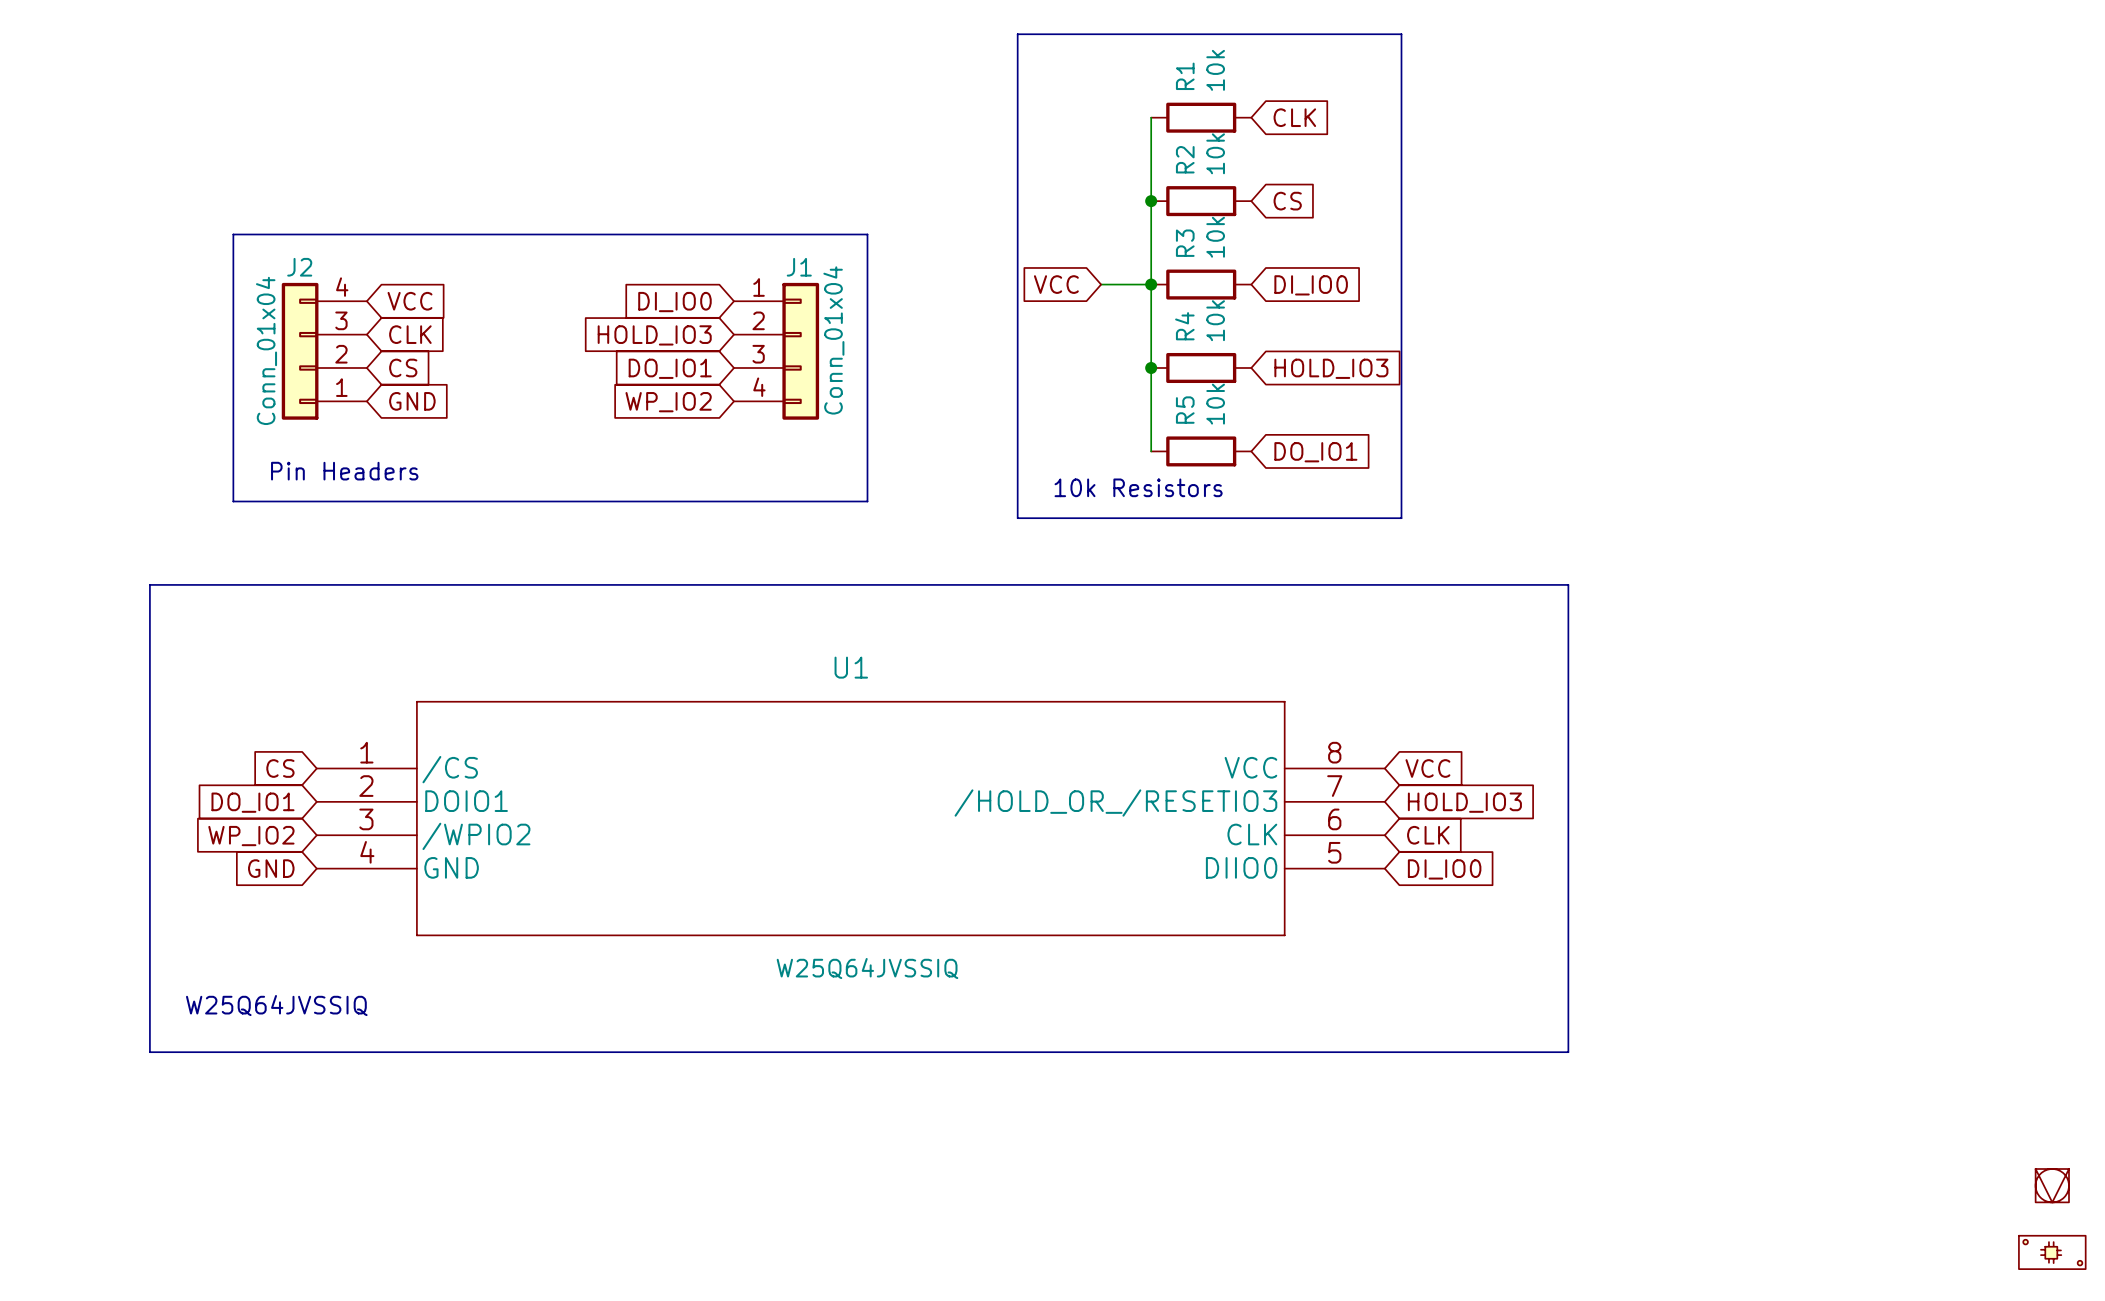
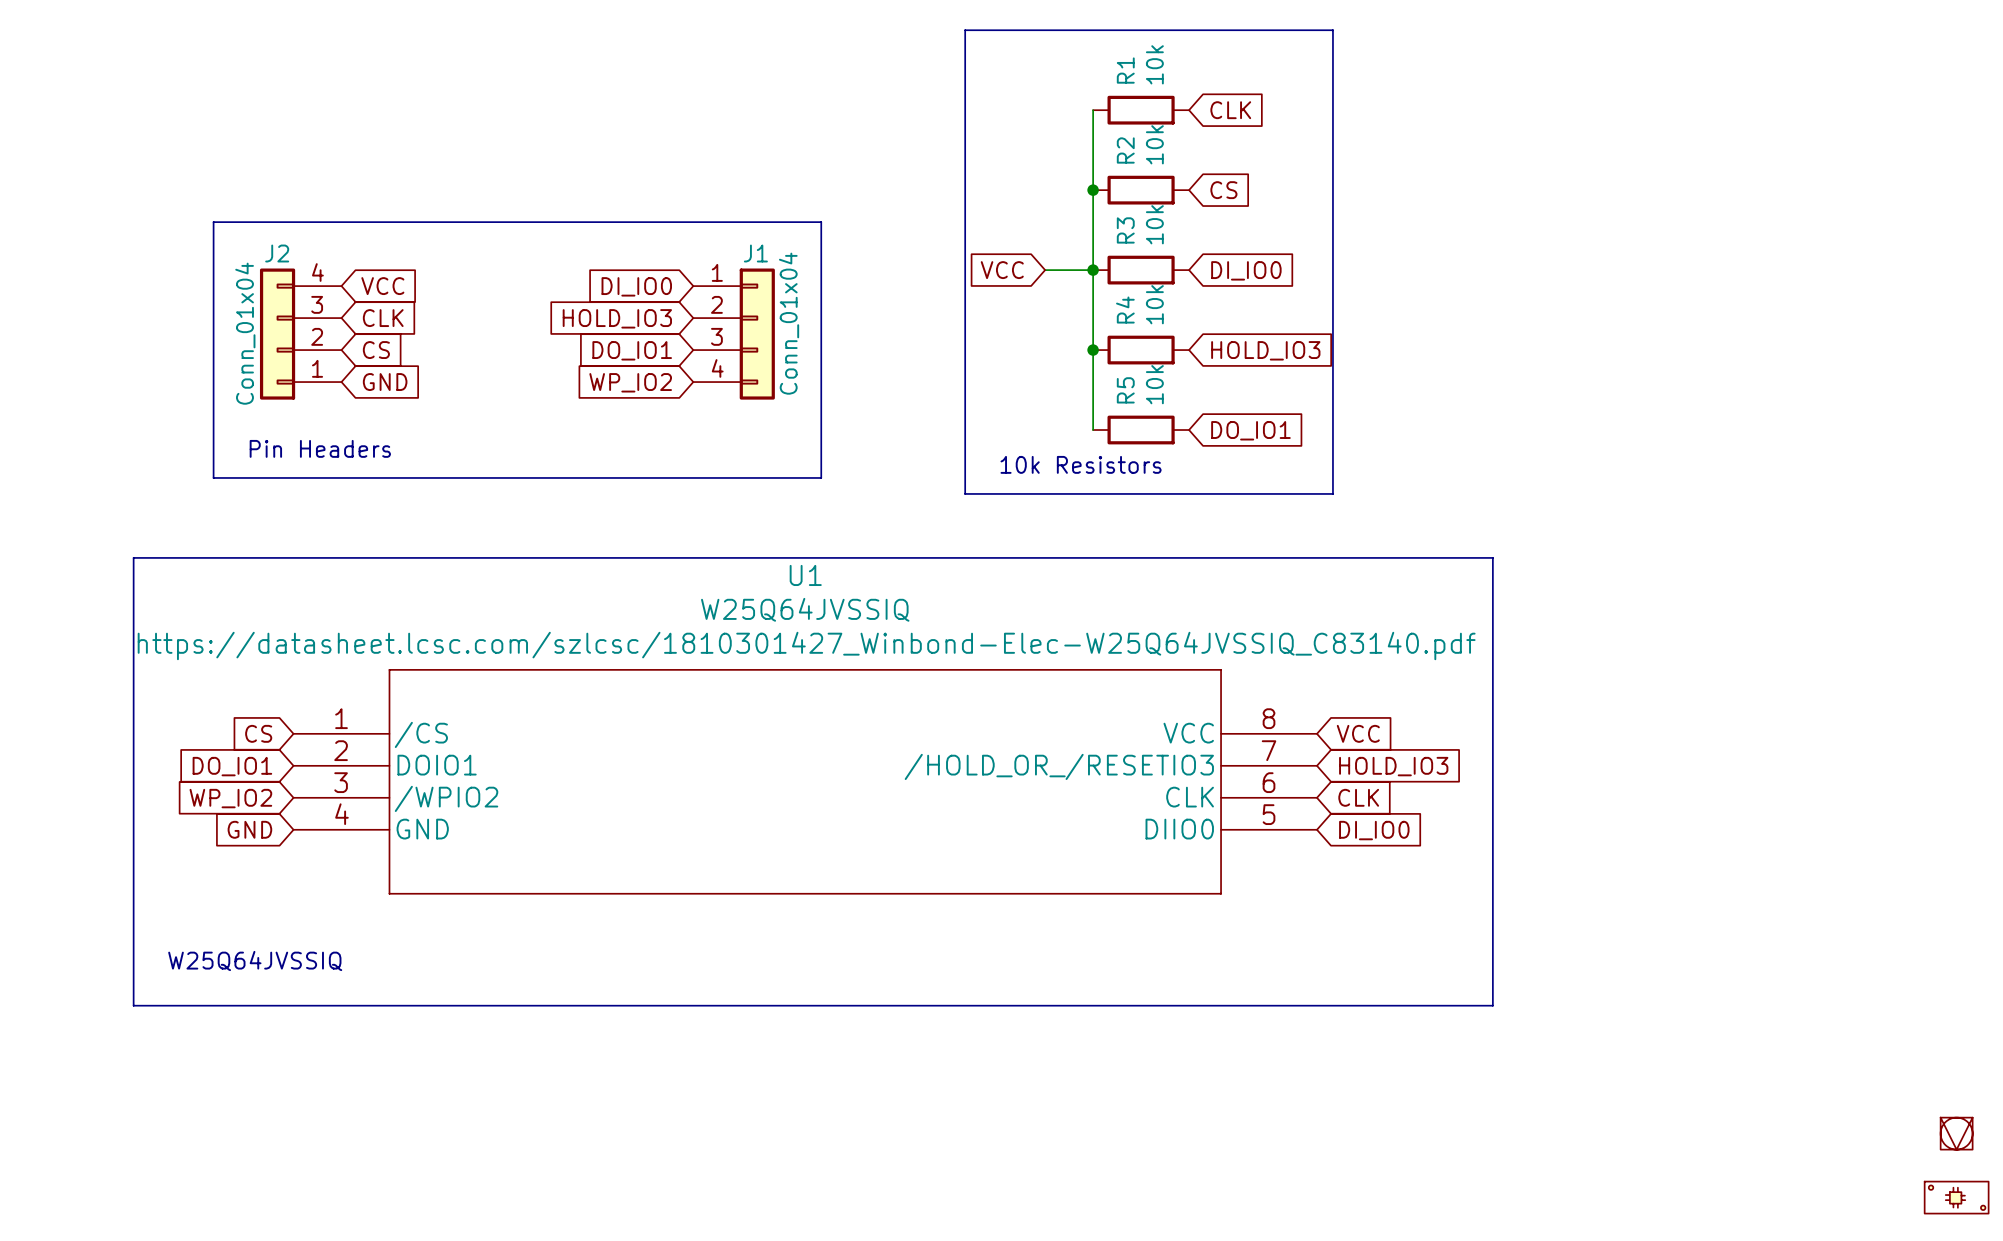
U1 value: none -> W25Q64JVSSIQ (805, 609)
U1 name position: U1 (851, 667) -> U1 (805, 575)
U1 text: none -> https://datasheet.lcsc.com/szlcsc/1810301427_Winbond-Elec-W25Q64JVSSIQ_C83140.pdf (806, 645)
U1 text: W25Q64JVSSIQ (867, 968) -> none

